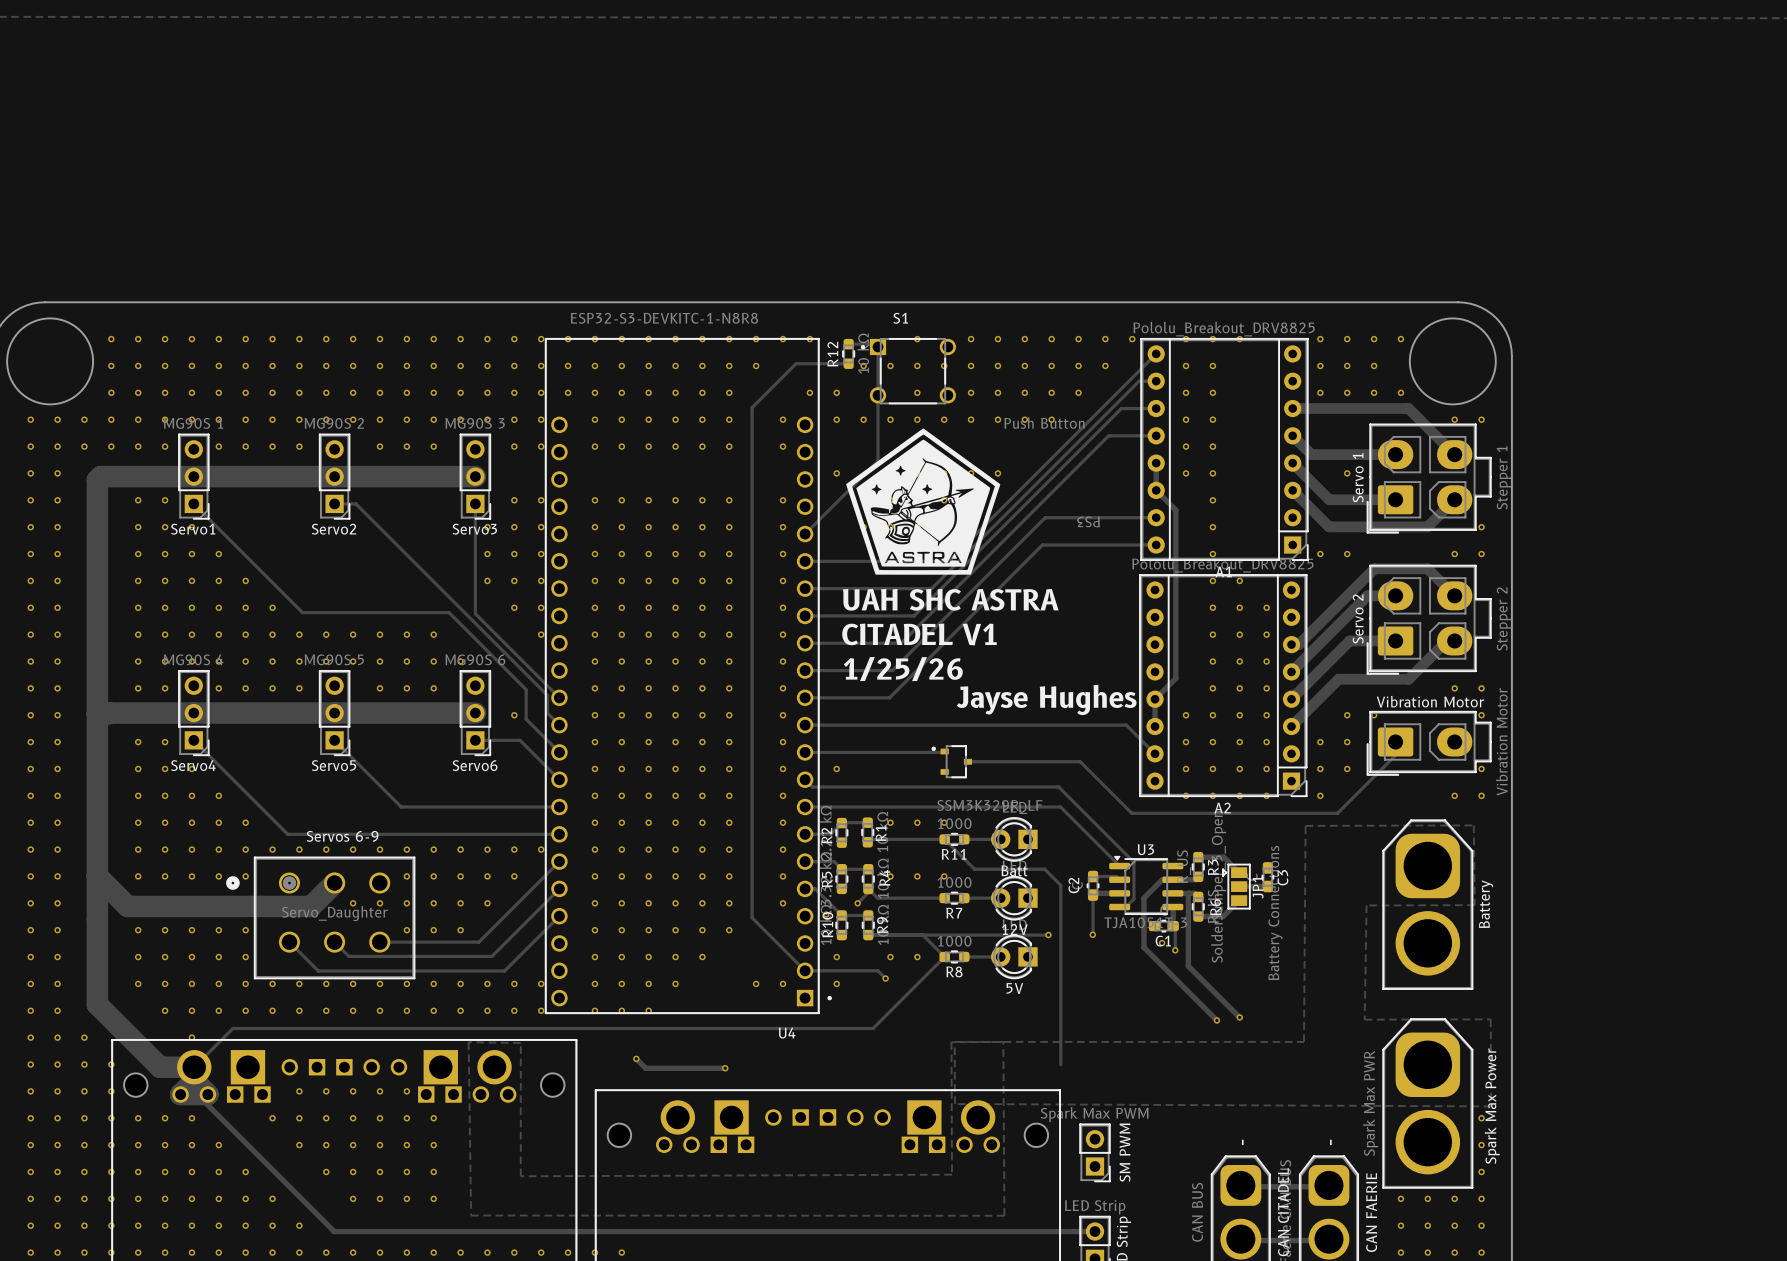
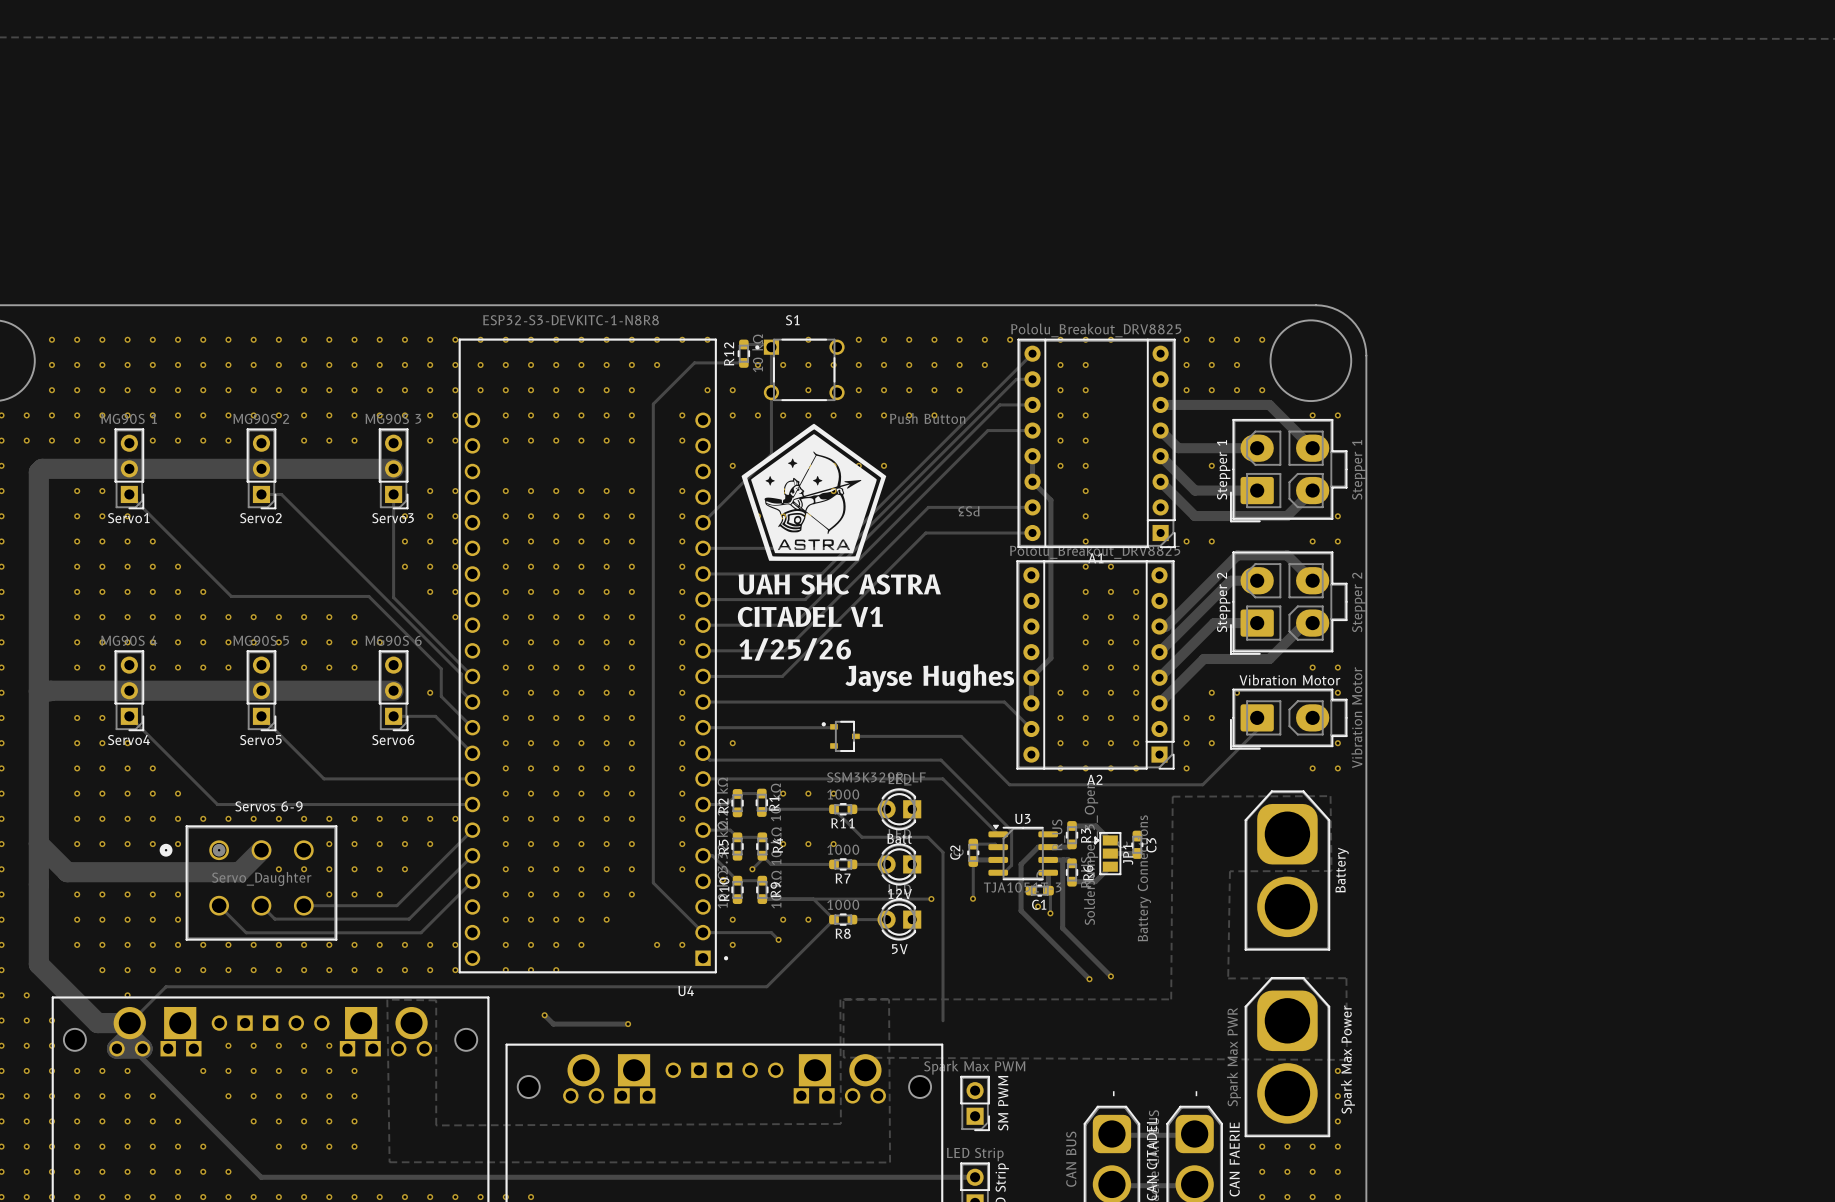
Servo 1 name: Servo 1 (1358, 477) -> Stepper 1 (1223, 469)
Servo 2 name: Servo 2 (1358, 618) -> Stepper 2 (1223, 602)

